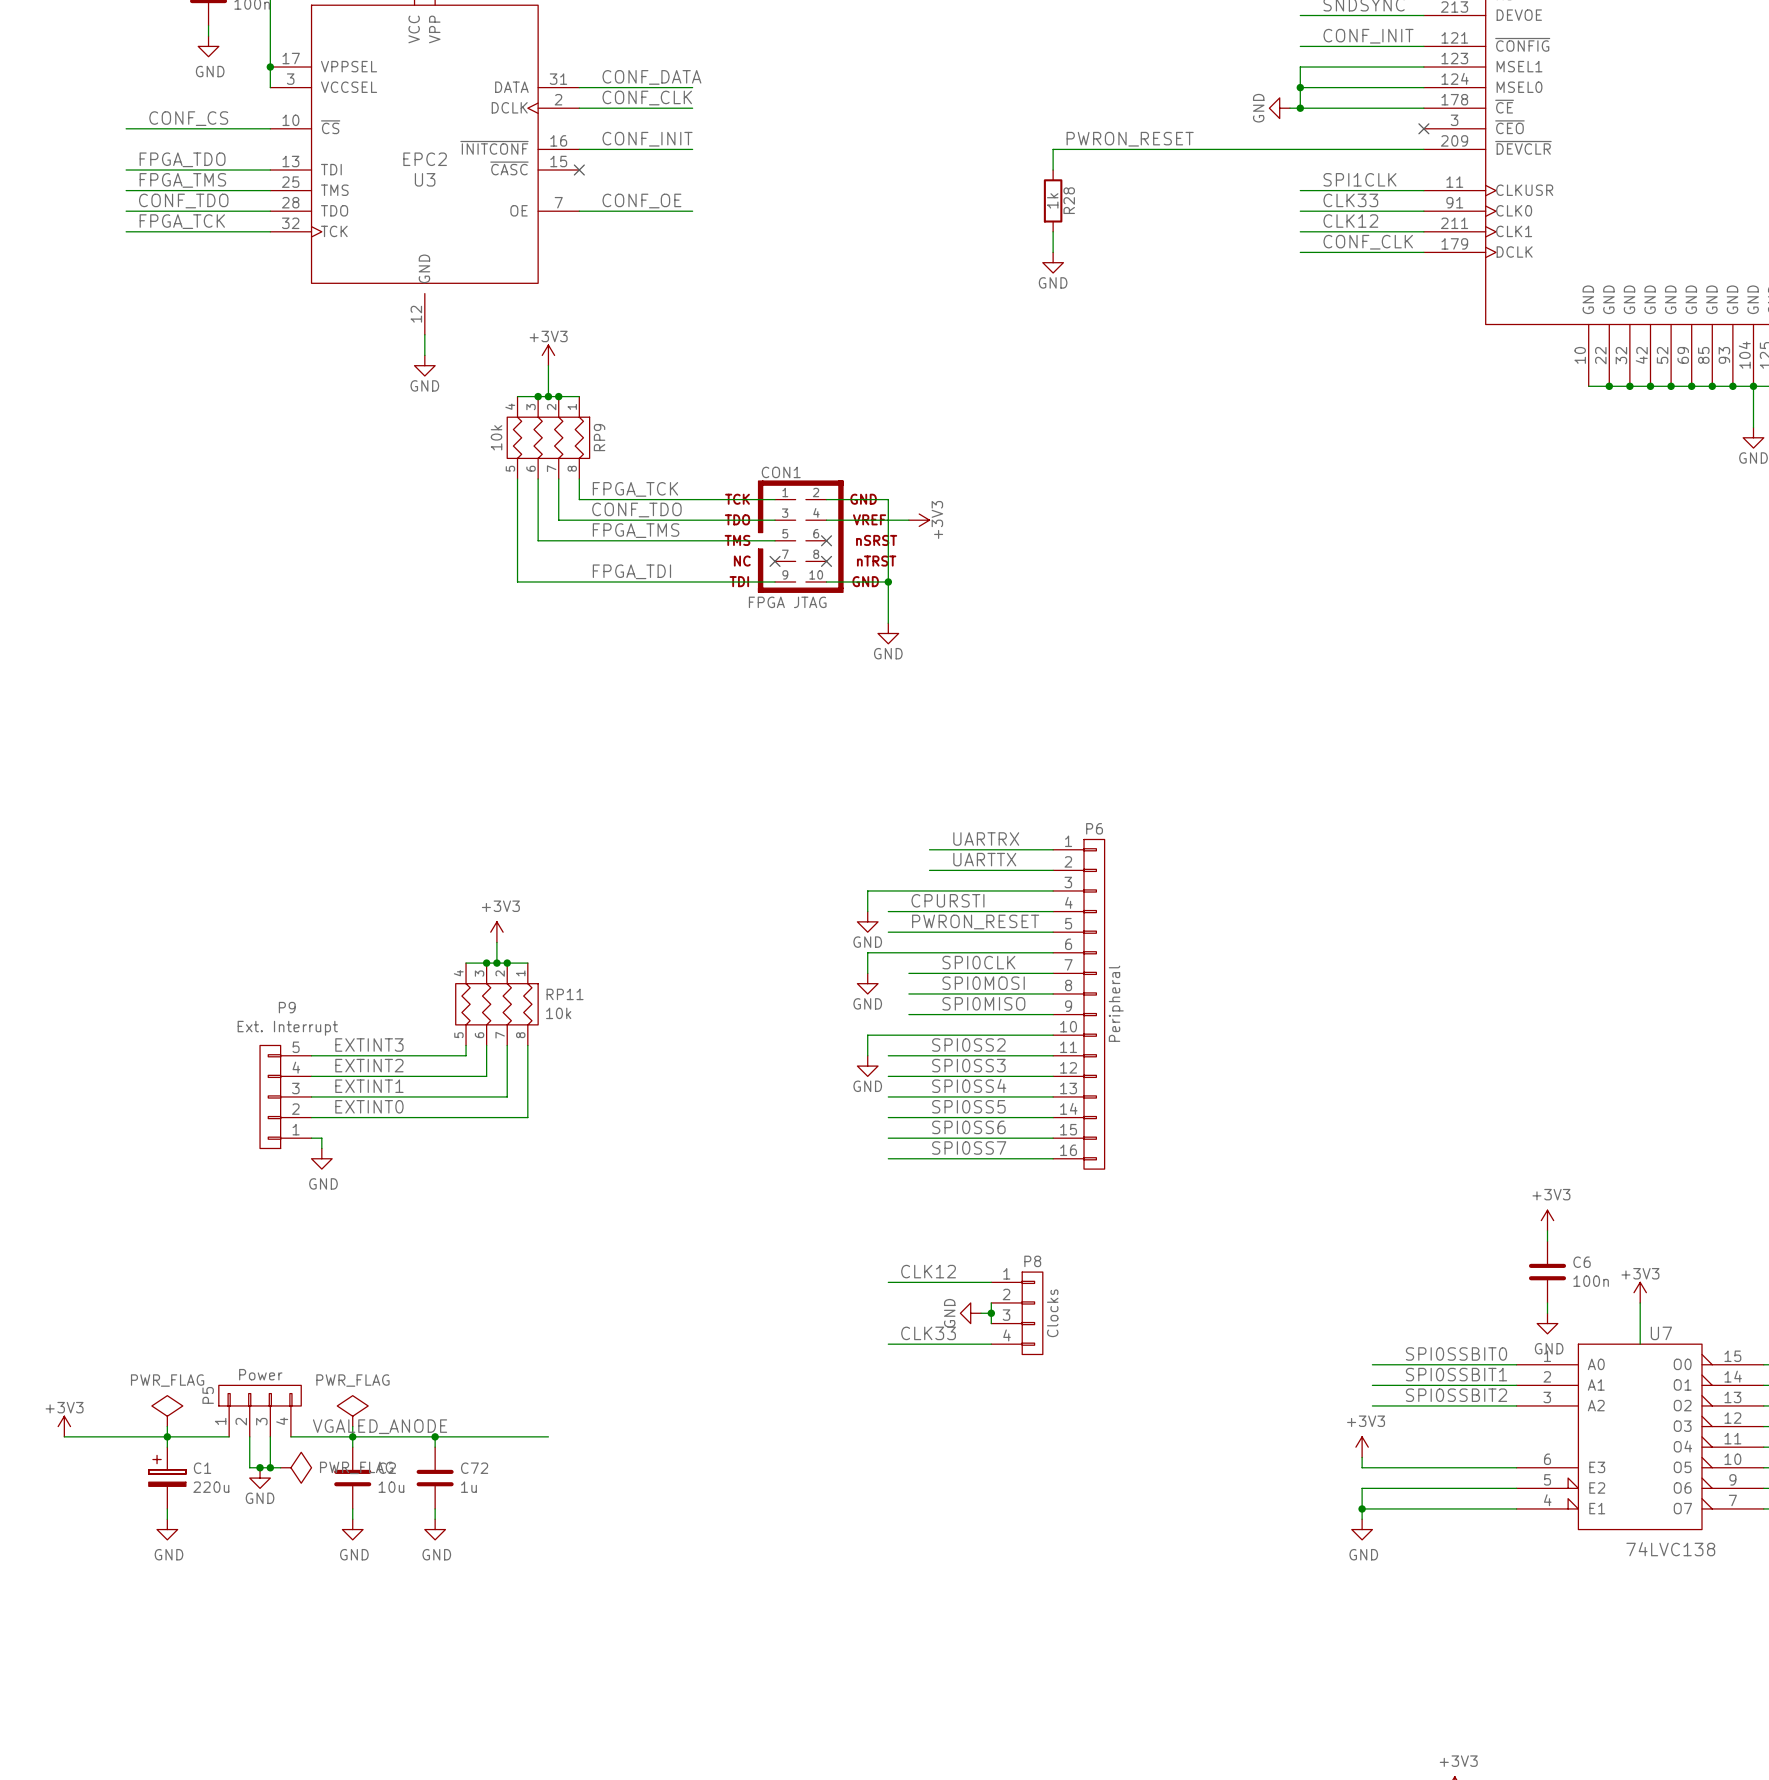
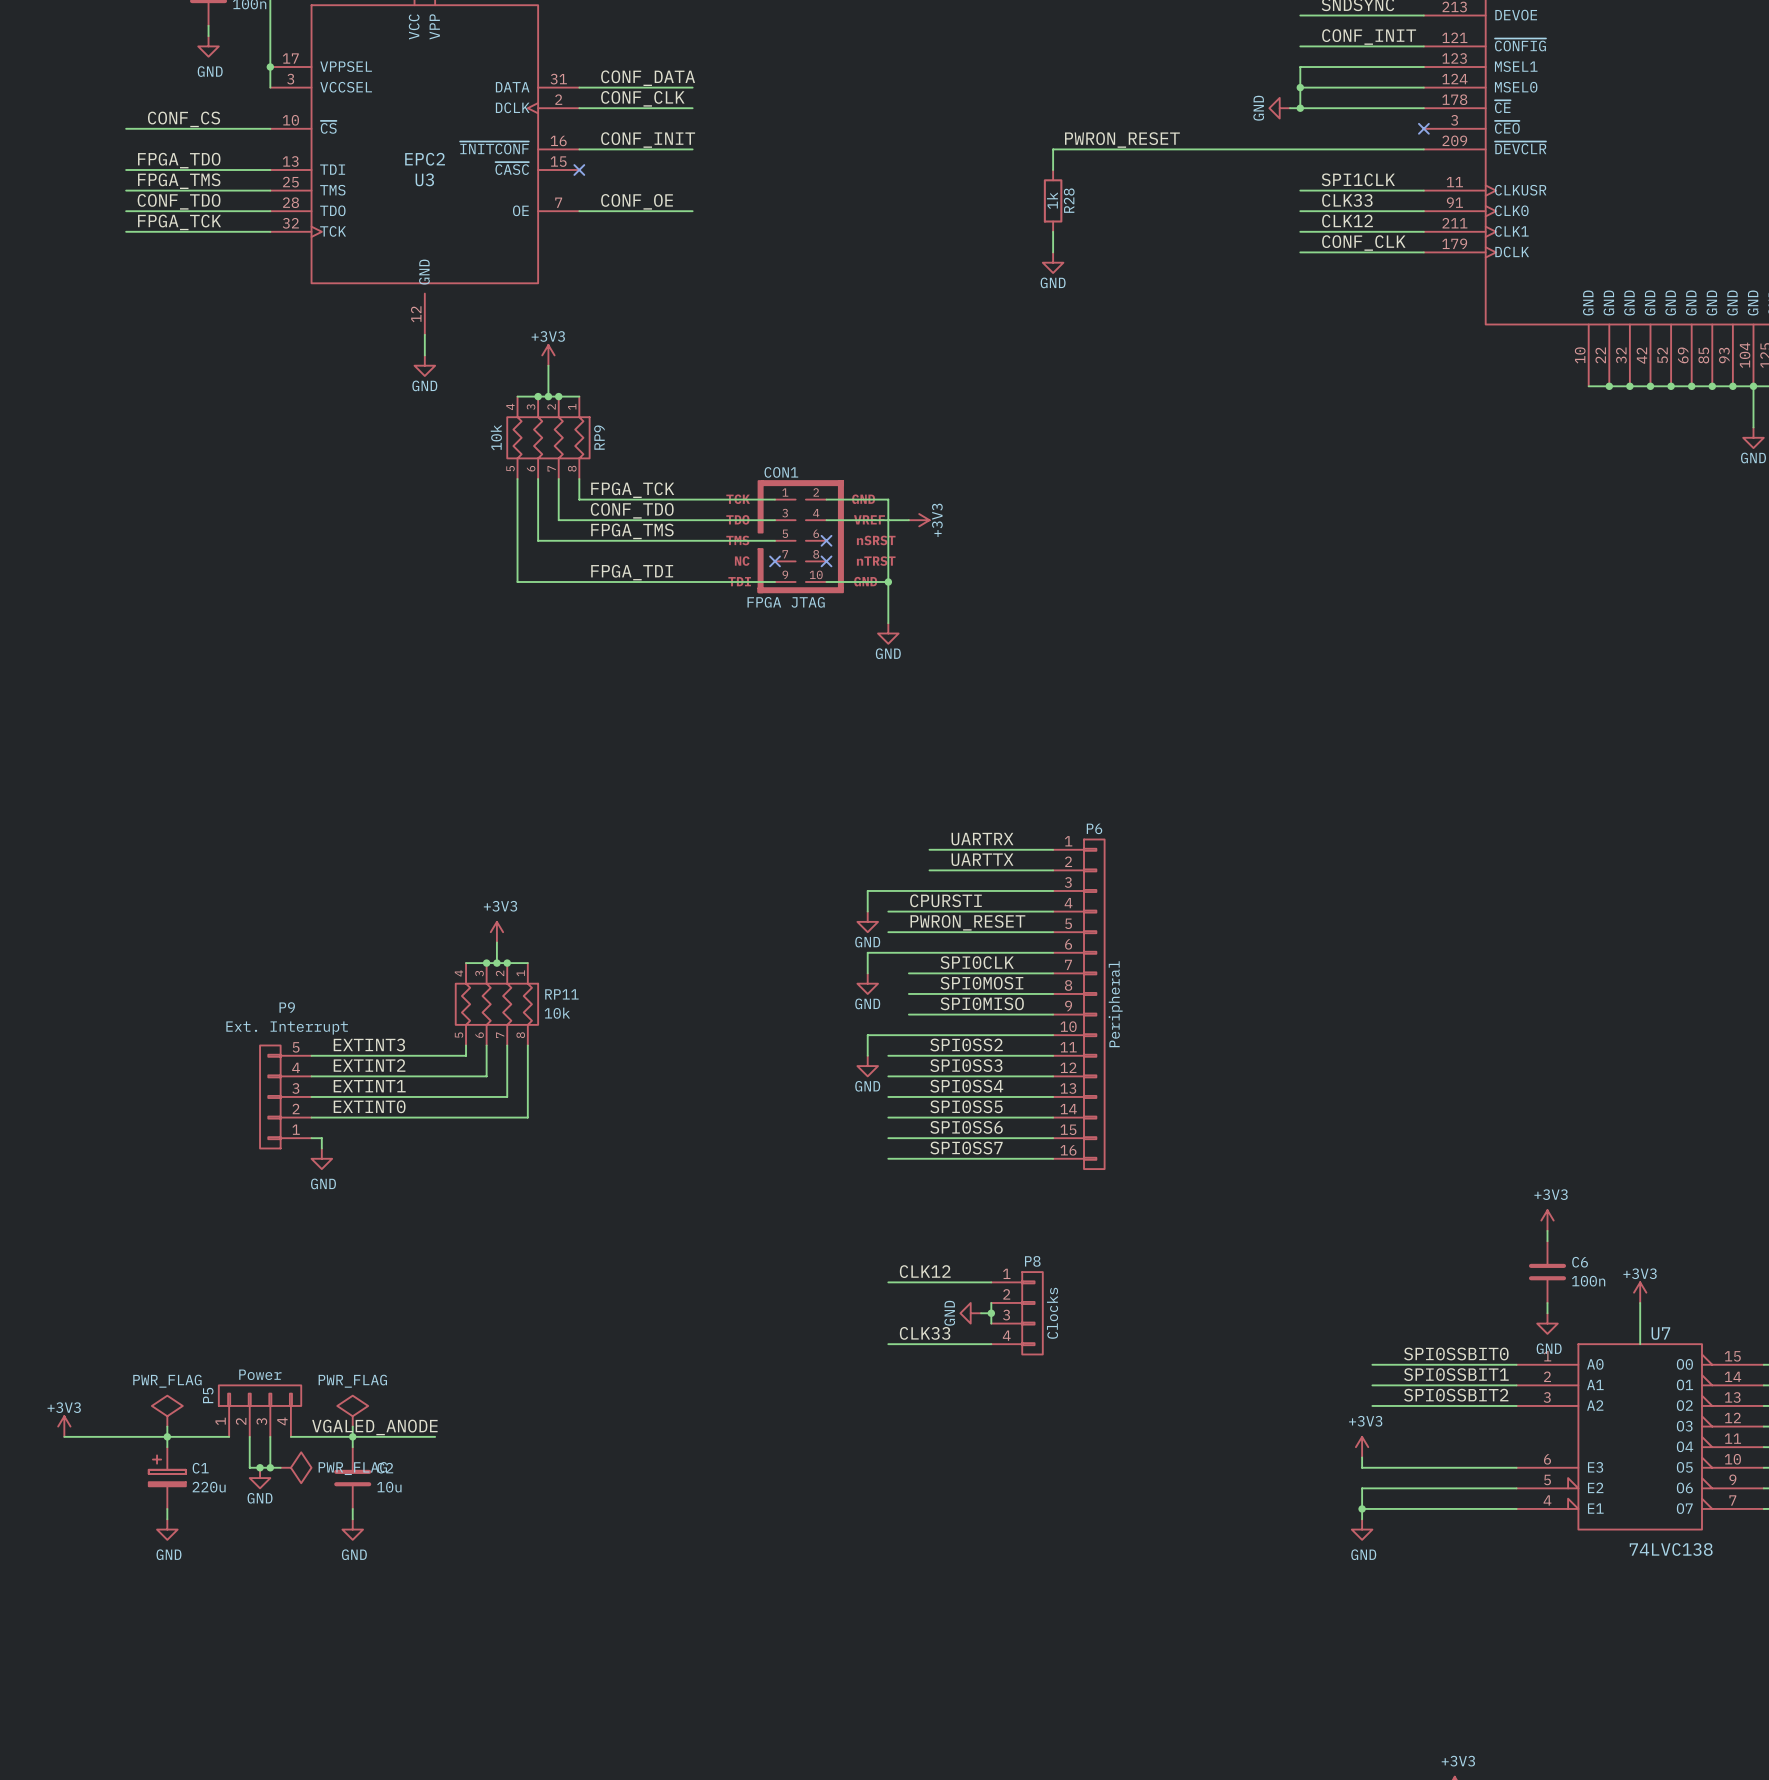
junction: (435, 1436) -> none
wire: (548, 1436) (435, 1436) (435, 1447) -> none
C72: 1u (435, 1478) -> none
wire: (435, 1508) (435, 1519) -> none
power symbol: GND (435, 1529) -> none

